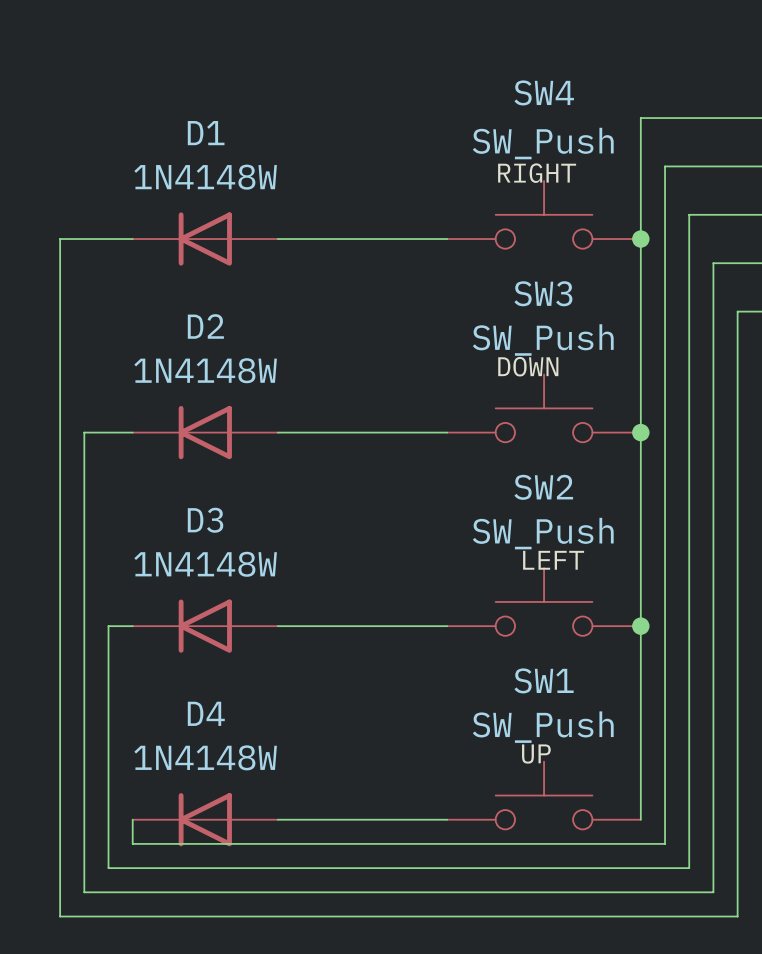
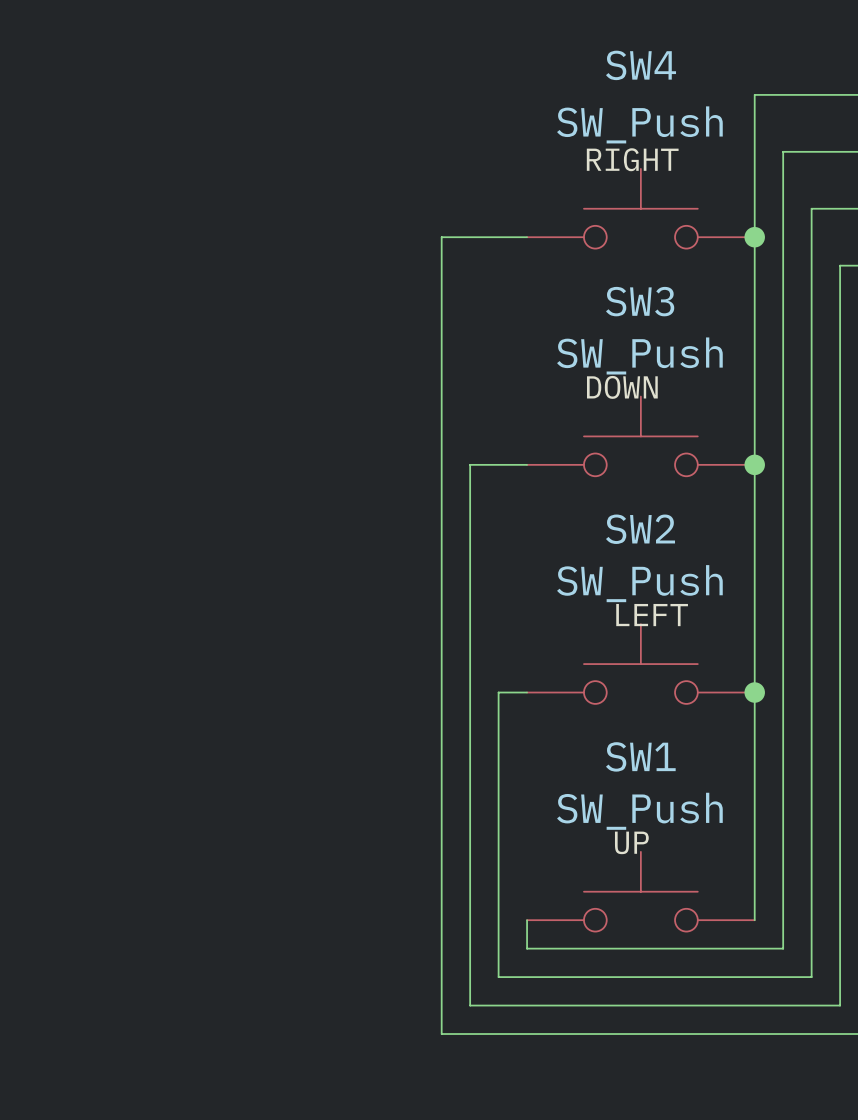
wire: (132, 239) (60, 239) (60, 916) (374, 916) -> (441, 237) (441, 1034)
D1: 1N4148W (205, 239) -> none
wire: (277, 239) (374, 239) -> none
wire: (132, 432) (84, 432) (84, 892) (398, 892) -> (470, 464) (470, 1005)
D2: 1N4148W (205, 432) -> none
wire: (277, 432) (398, 432) -> none
wire: (132, 626) (108, 626) (108, 868) (423, 868) -> none
D3: 1N4148W (205, 626) -> none
wire: (277, 626) (423, 626) -> (498, 977) (498, 692)
wire: (132, 819) (132, 843) (447, 843) -> none
D4: 1N4148W (205, 819) -> none
wire: (277, 819) (447, 819) -> (527, 948) (527, 920)

